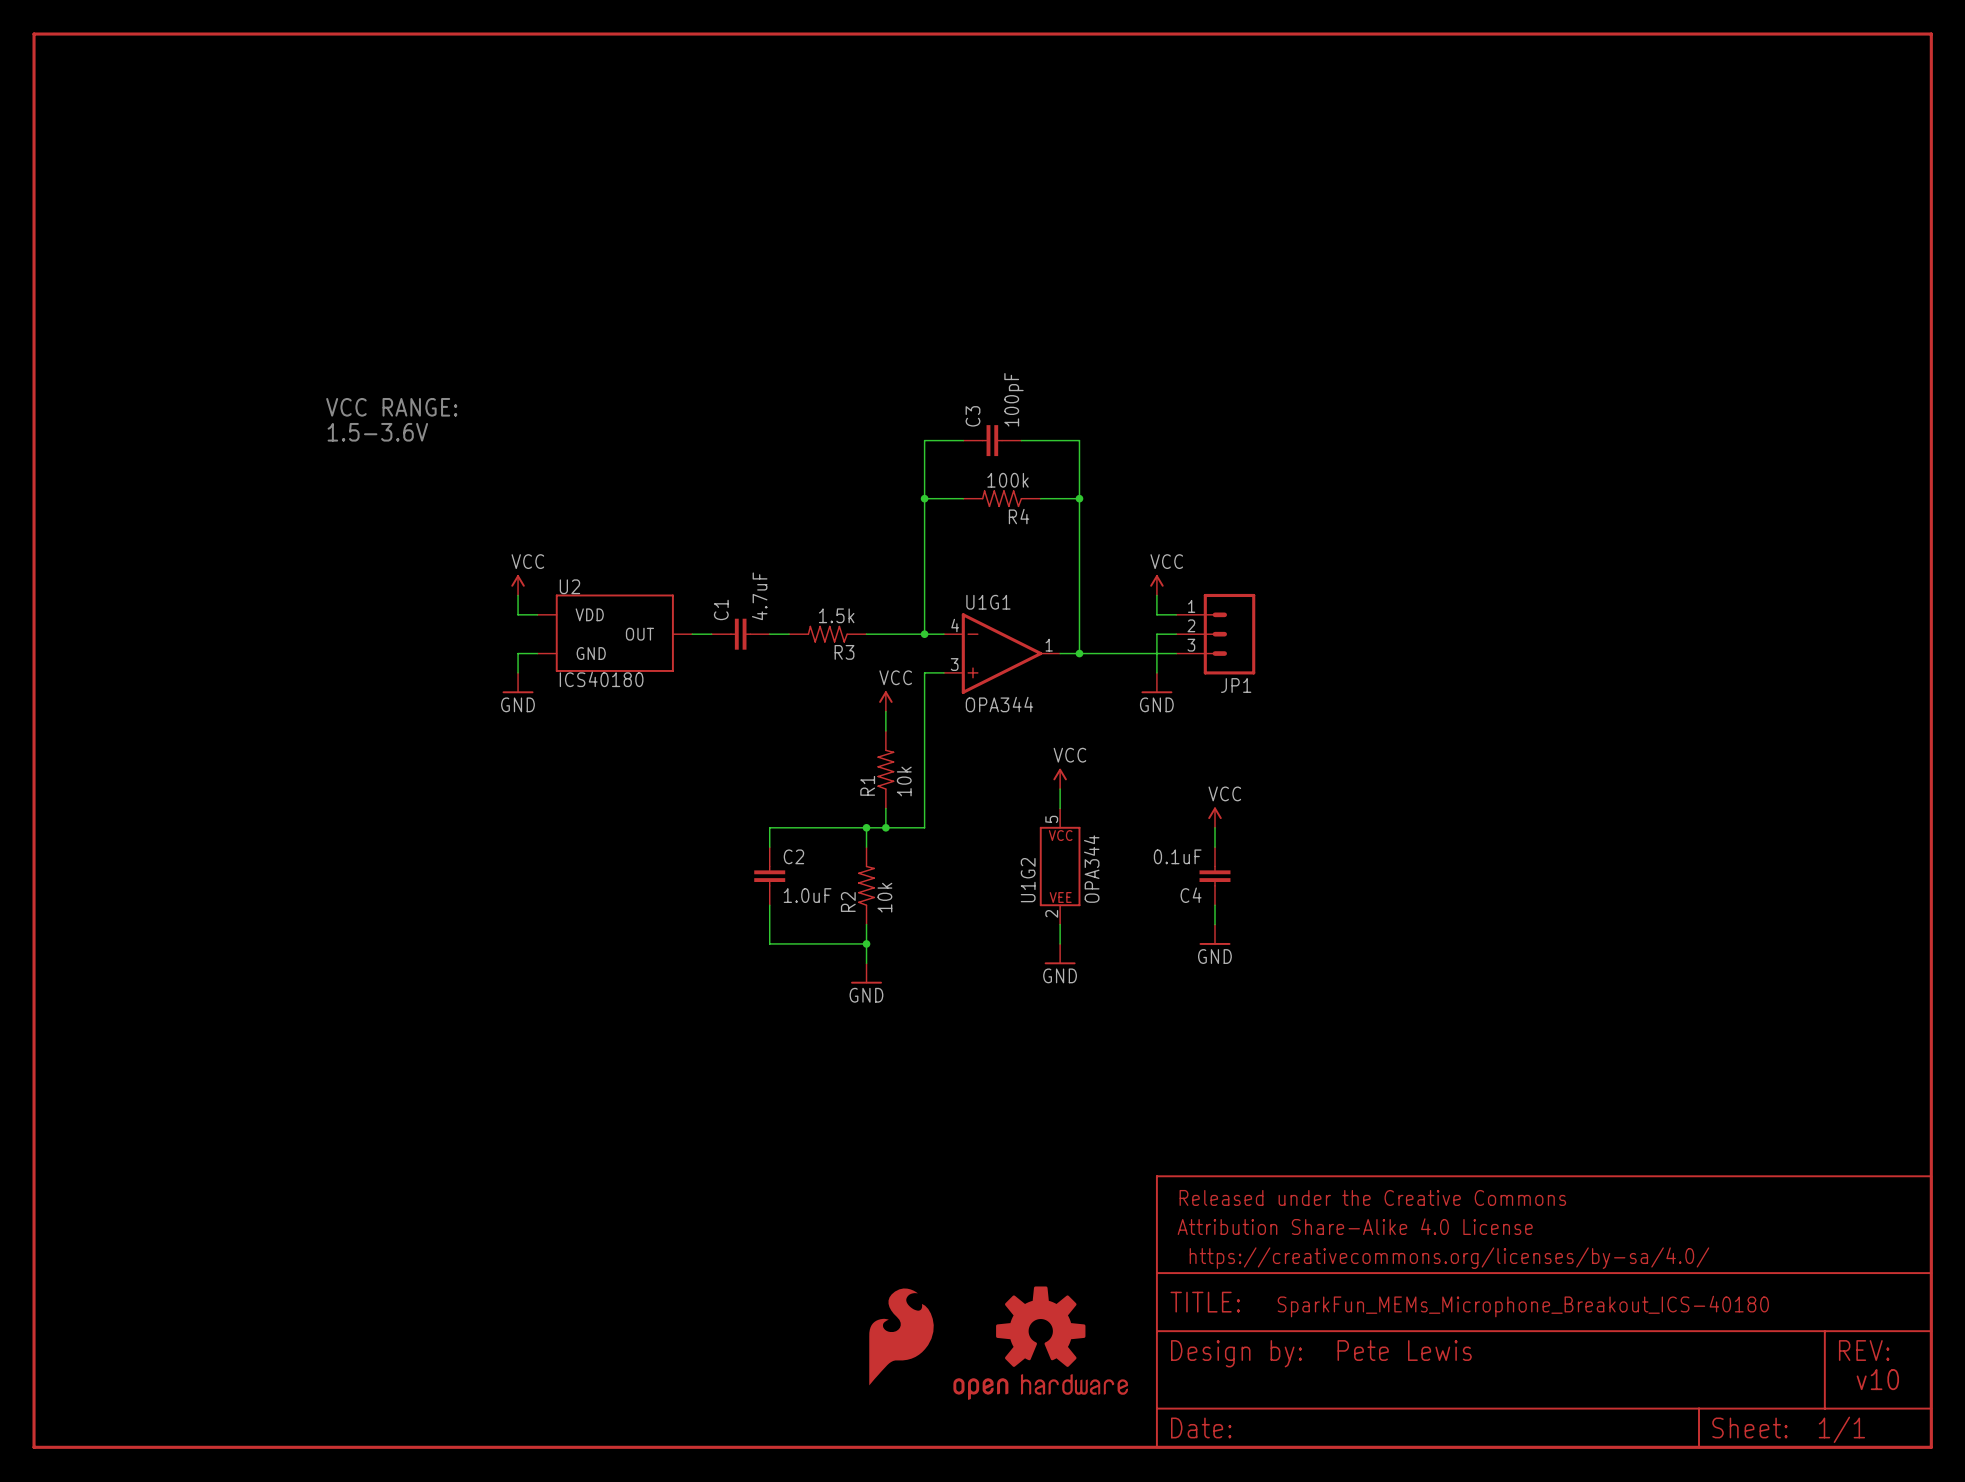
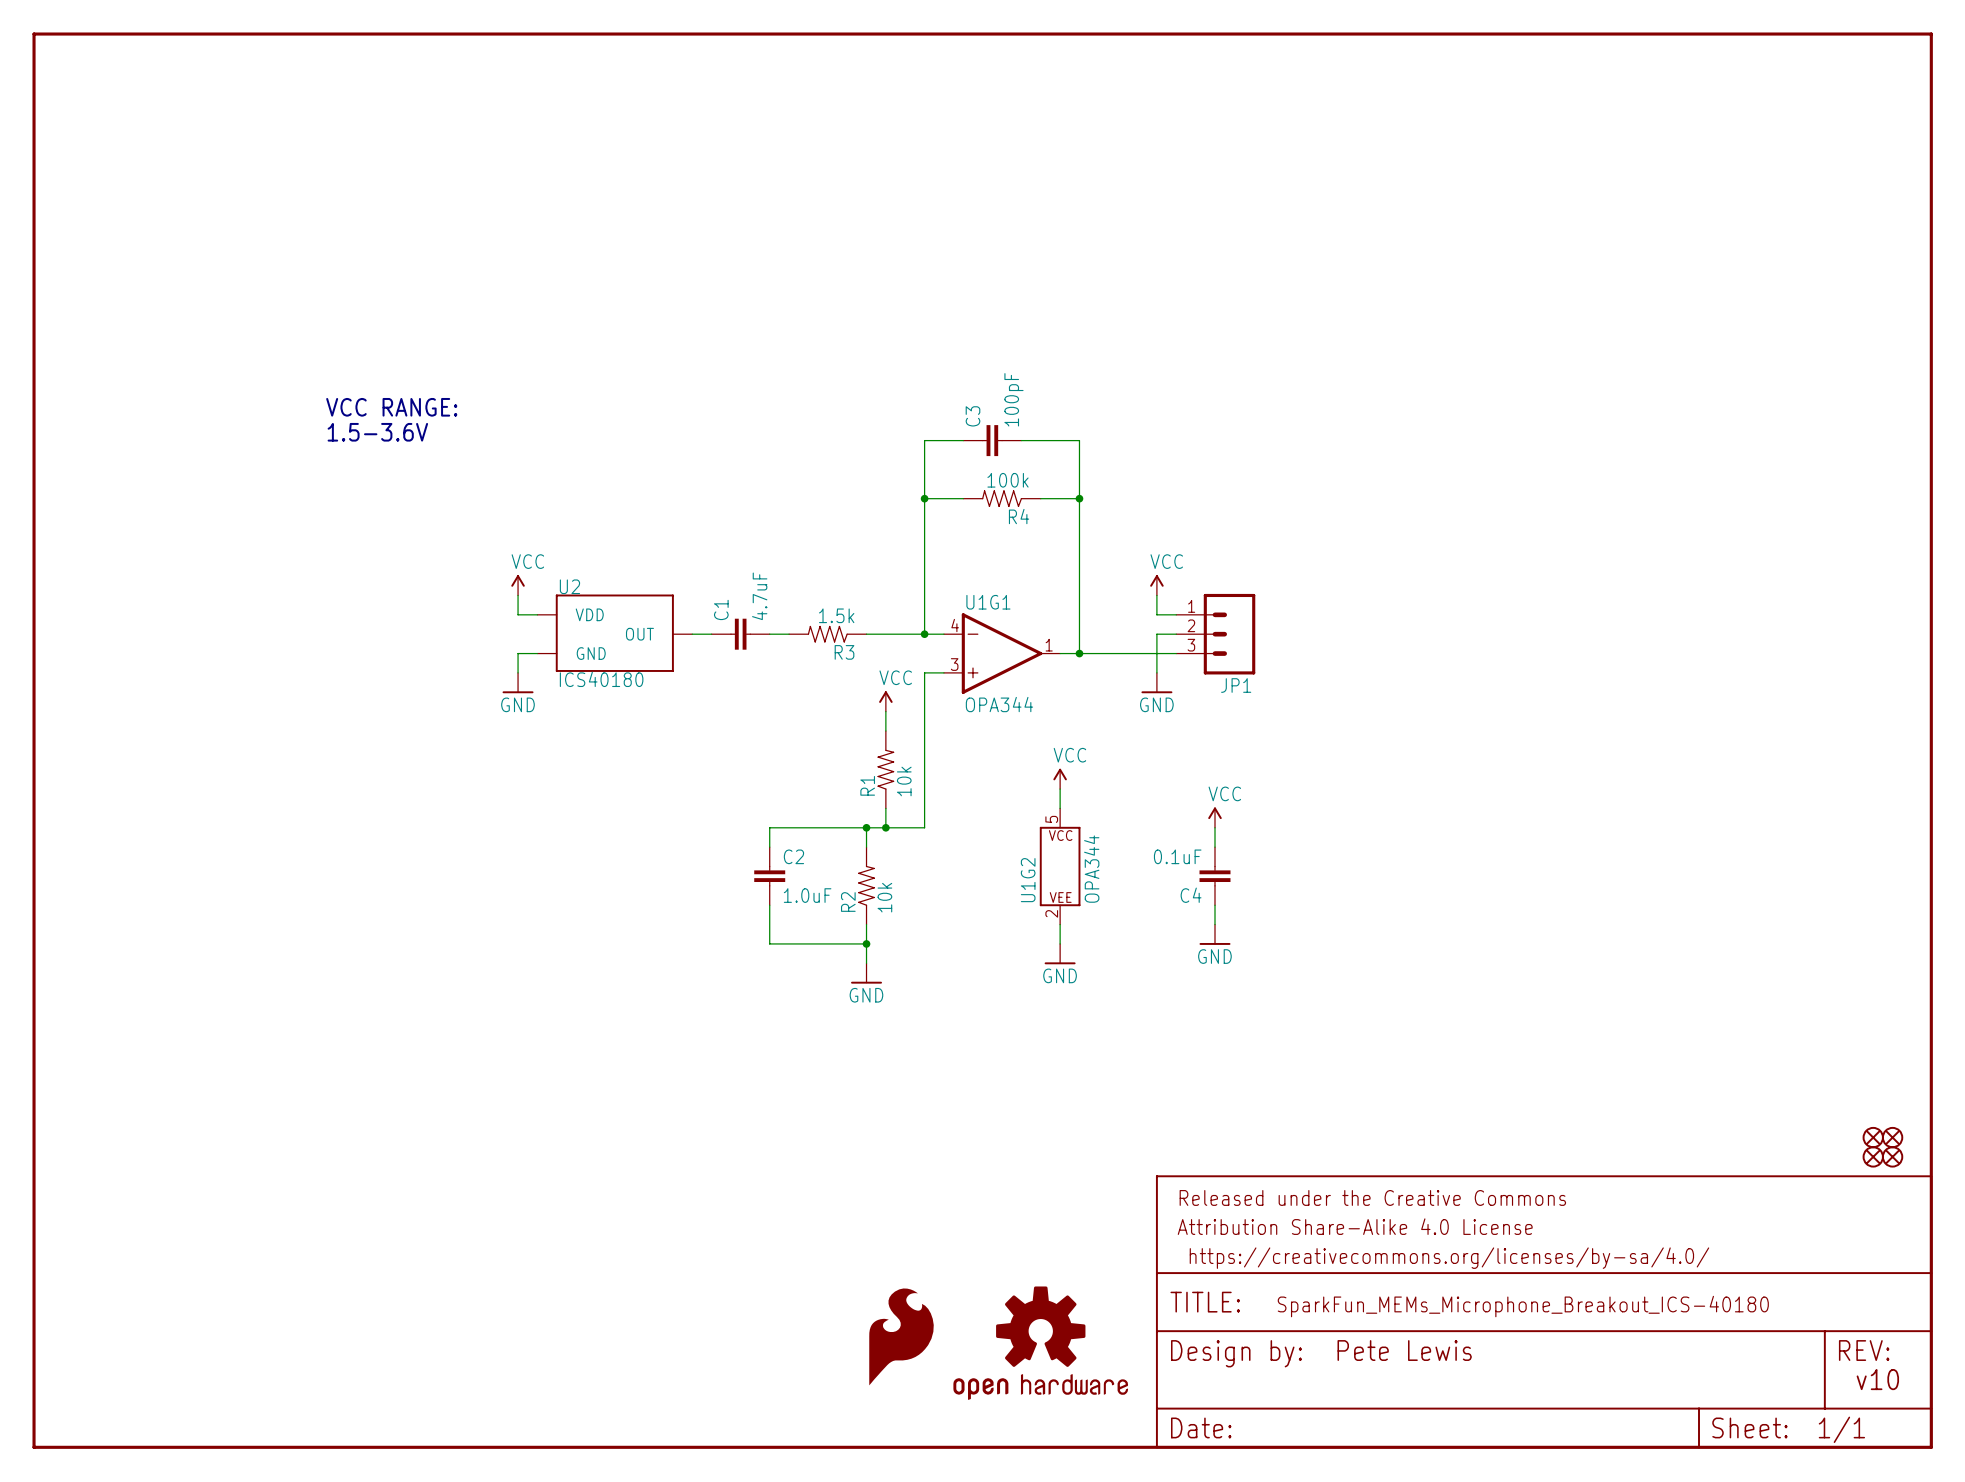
part: none -> (1873, 1137)
part: none -> (1892, 1137)
part: none -> (1873, 1156)
part: none -> (1892, 1156)

